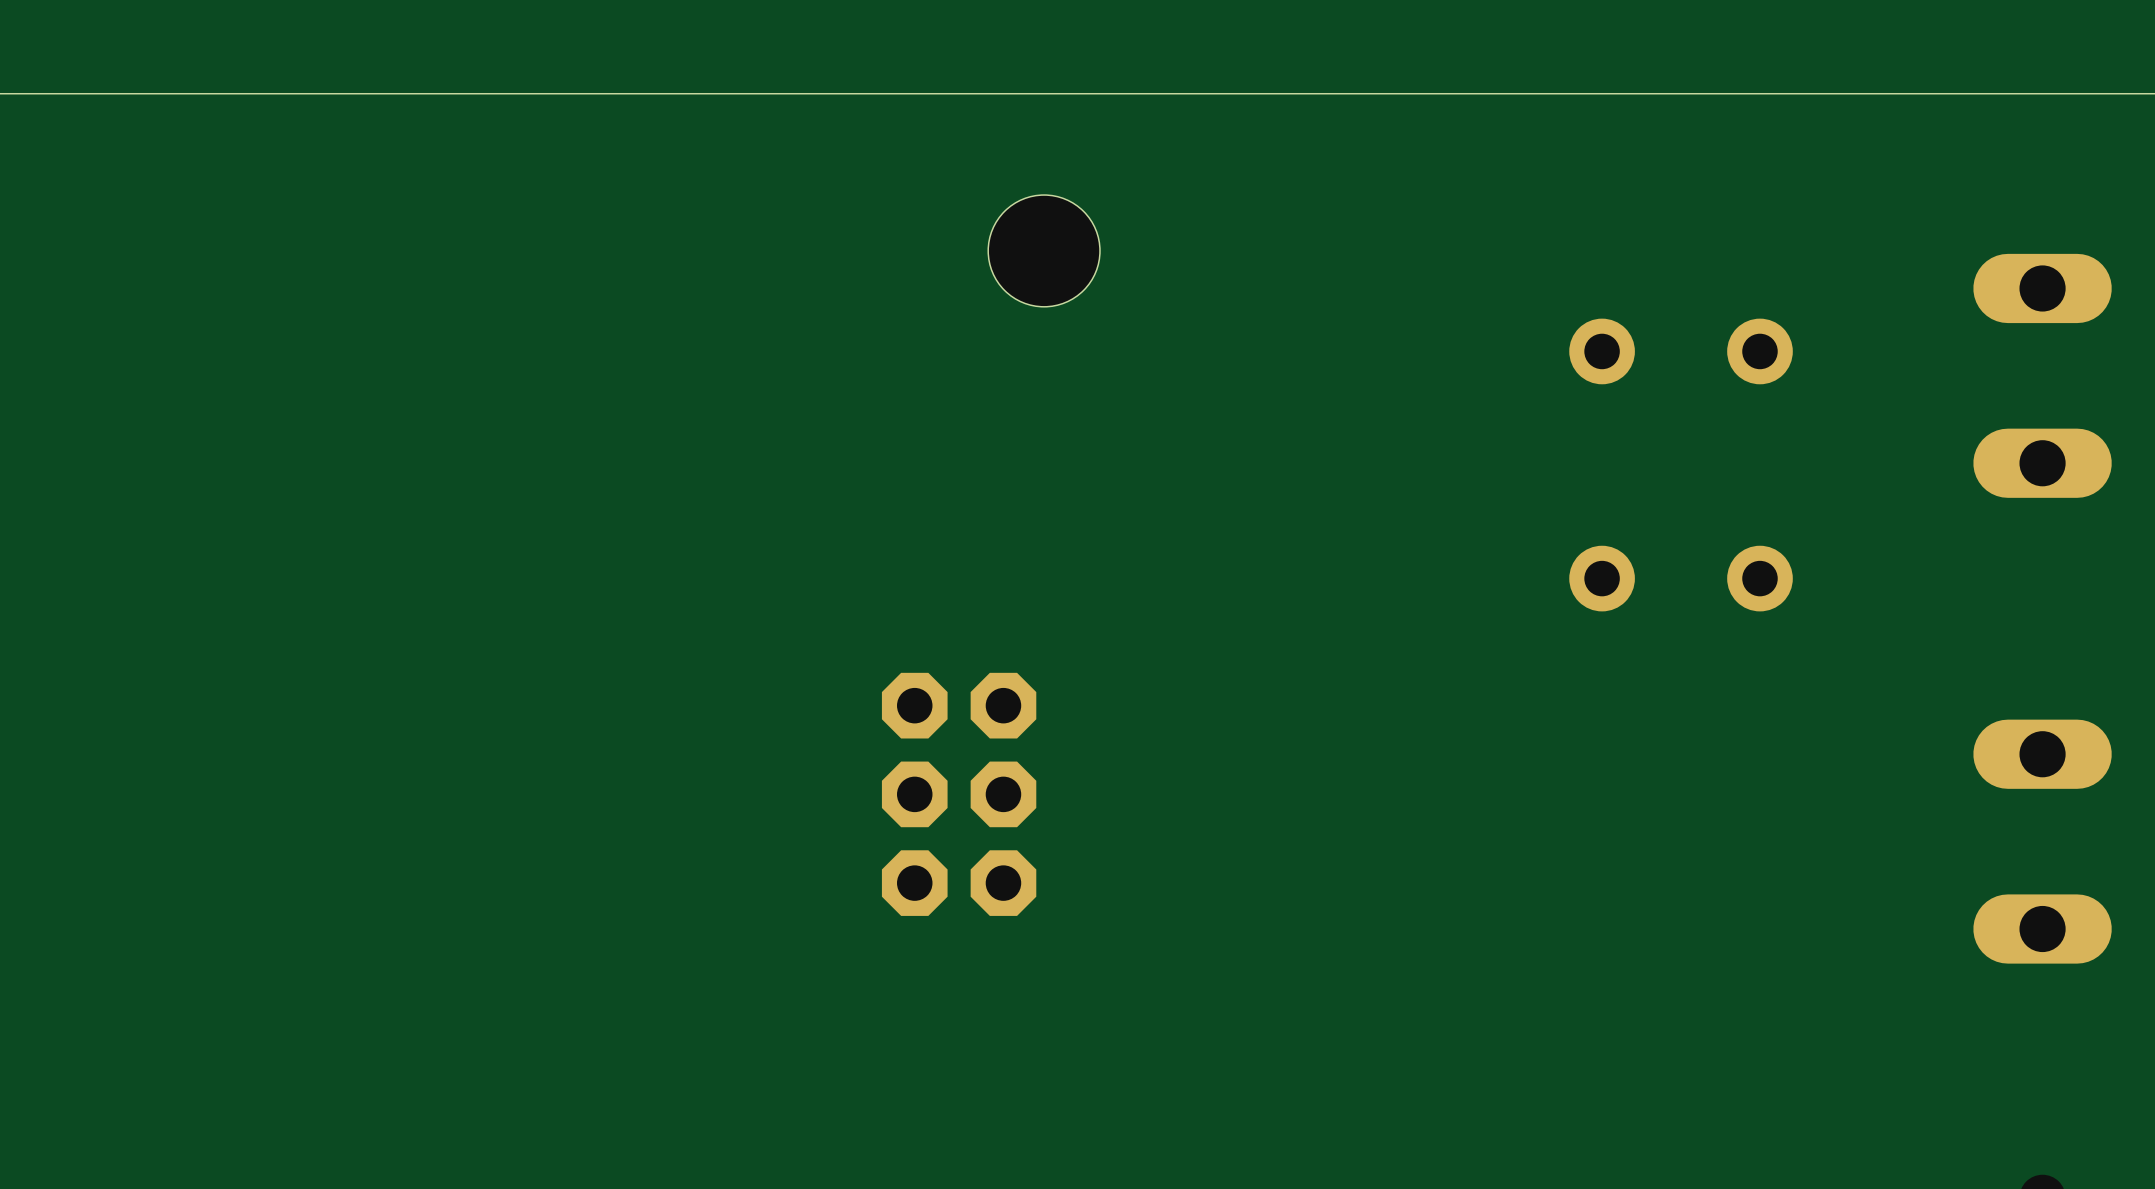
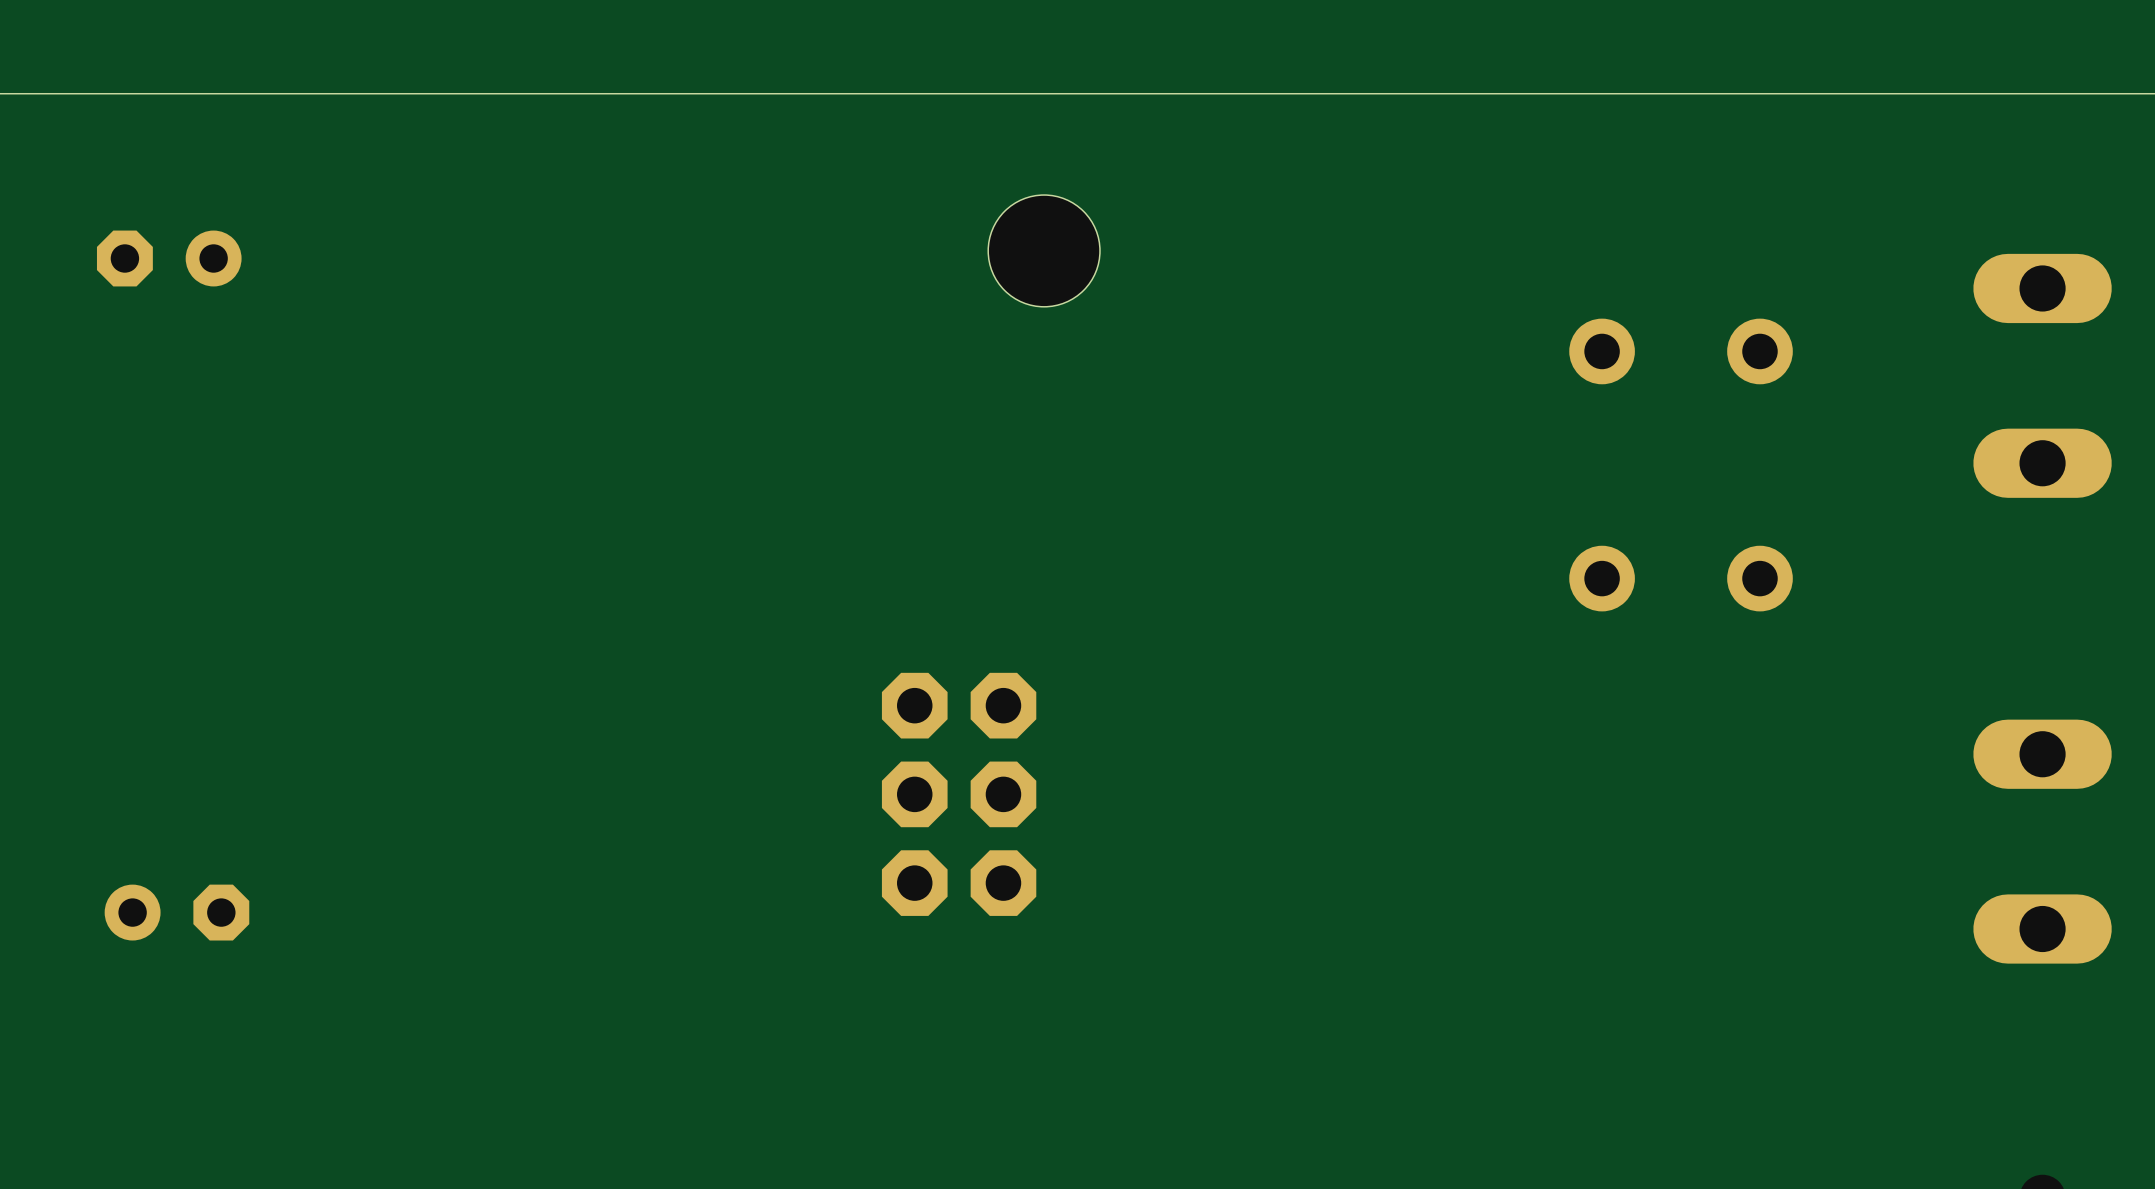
part: none -> (169, 258)
part: none -> (176, 912)

